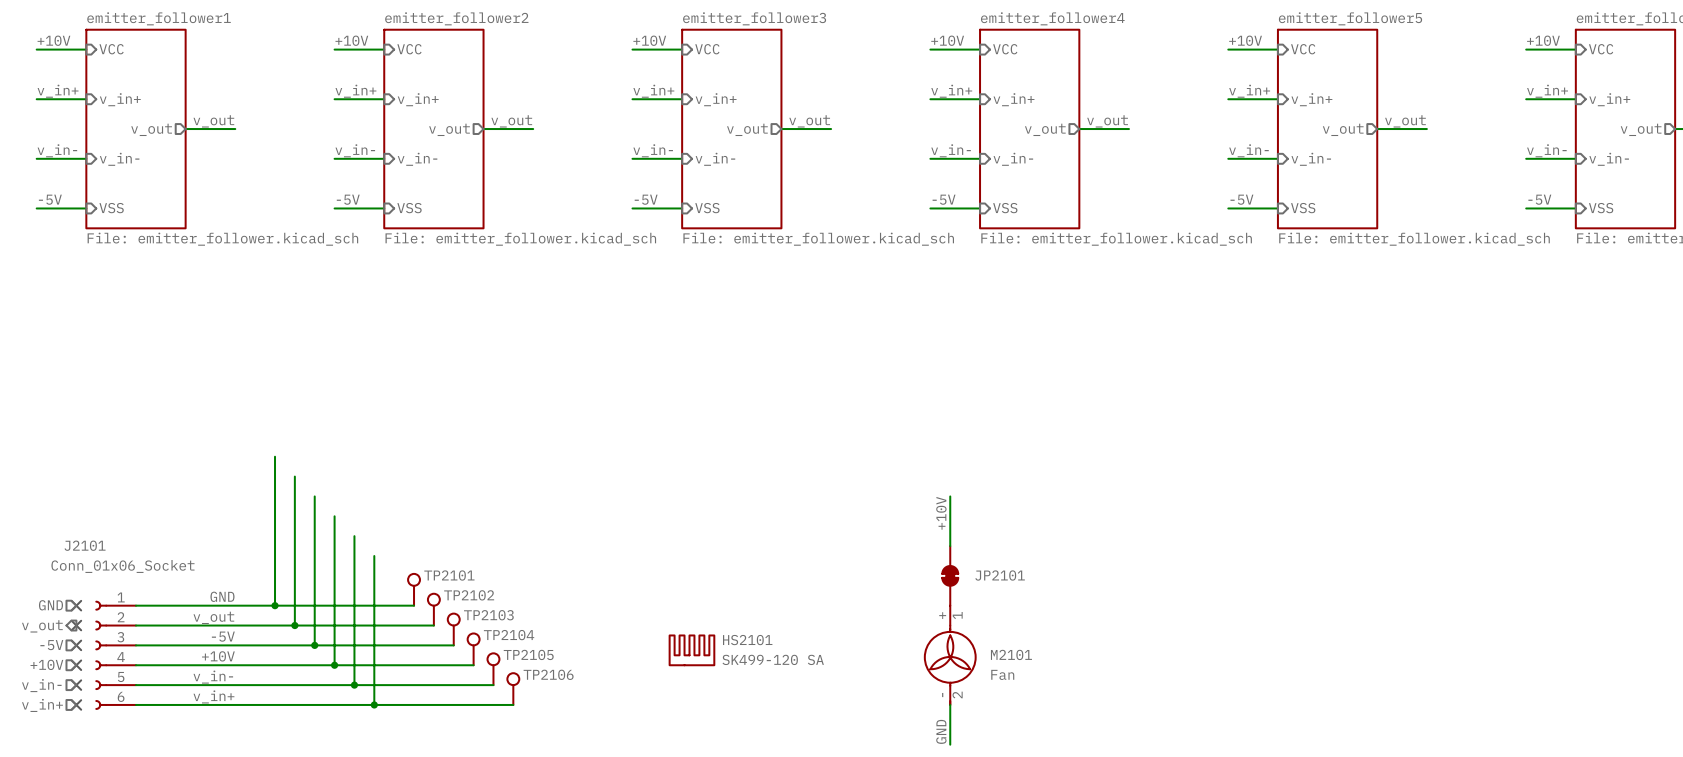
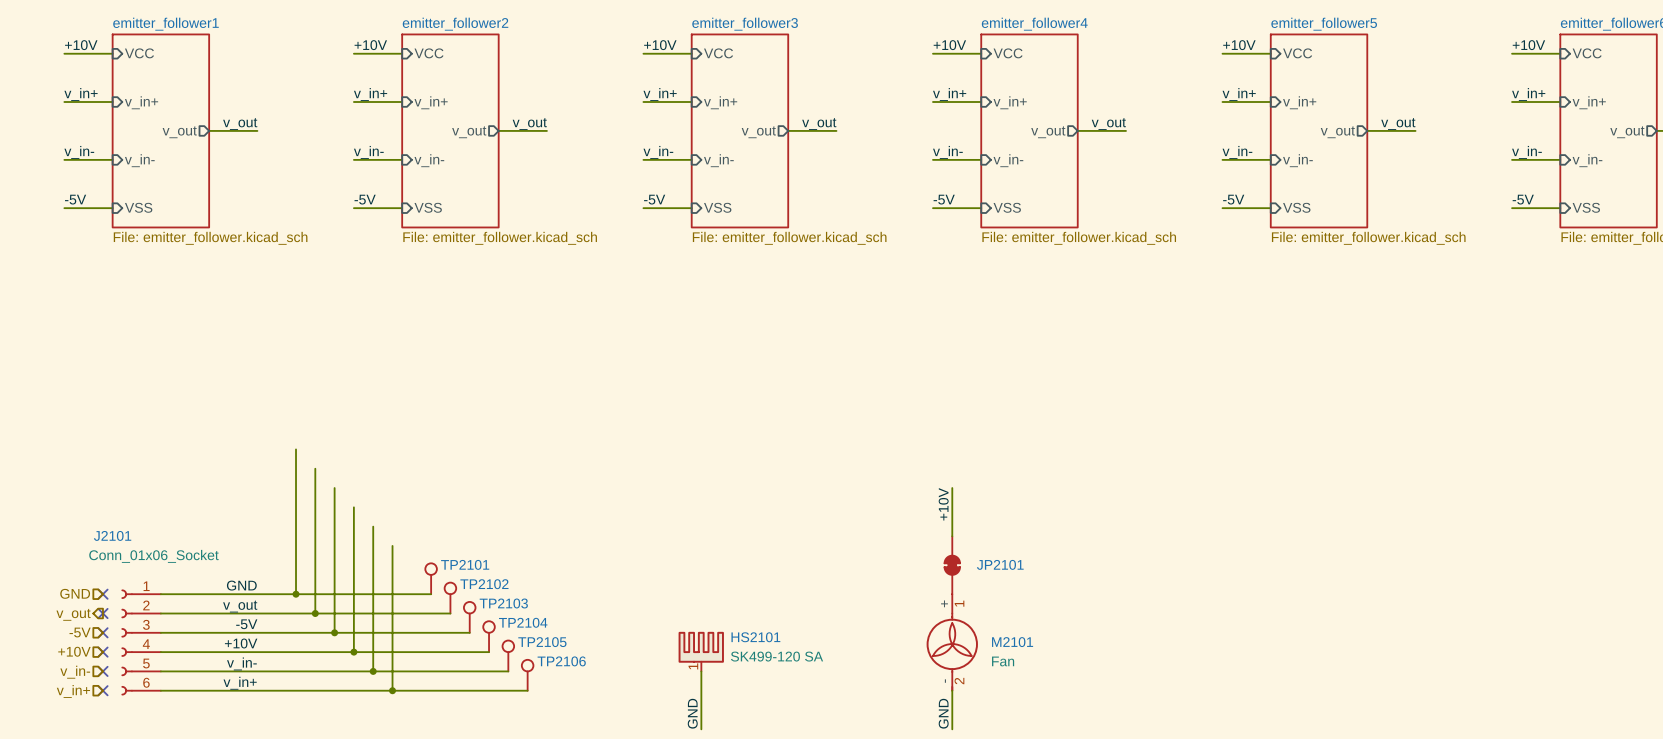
HS2101 symbol: [668, 634, 716, 667] -> [678, 631, 724, 672]
wire: none -> (701, 671) (701, 729)
label: none -> GND (692, 713)

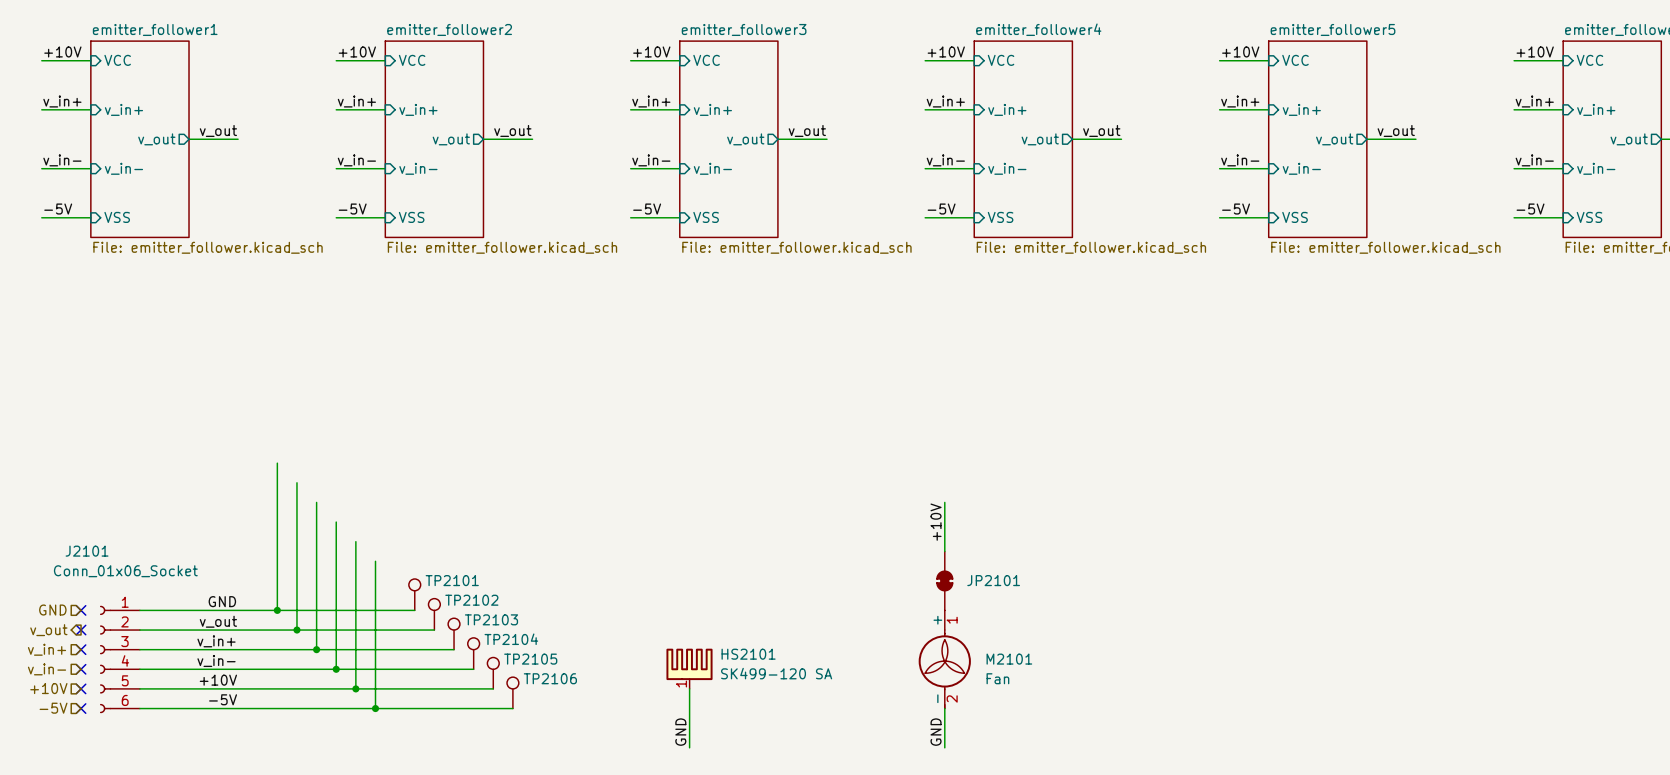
label: -5V (246, 624) -> v_in+ (216, 641)
hierarchical label: -5V (80, 632) -> v_in+ (47, 649)
label: +10V (241, 643) -> v_in- (216, 661)
hierarchical label: +10V (74, 651) -> v_in- (47, 669)
label: v_in- (241, 663) -> +10V (218, 680)
hierarchical label: v_in- (75, 672) -> +10V (48, 688)
label: v_in+ (240, 683) -> -5V (223, 699)
hierarchical label: v_in+ (73, 691) -> -5V (53, 708)

